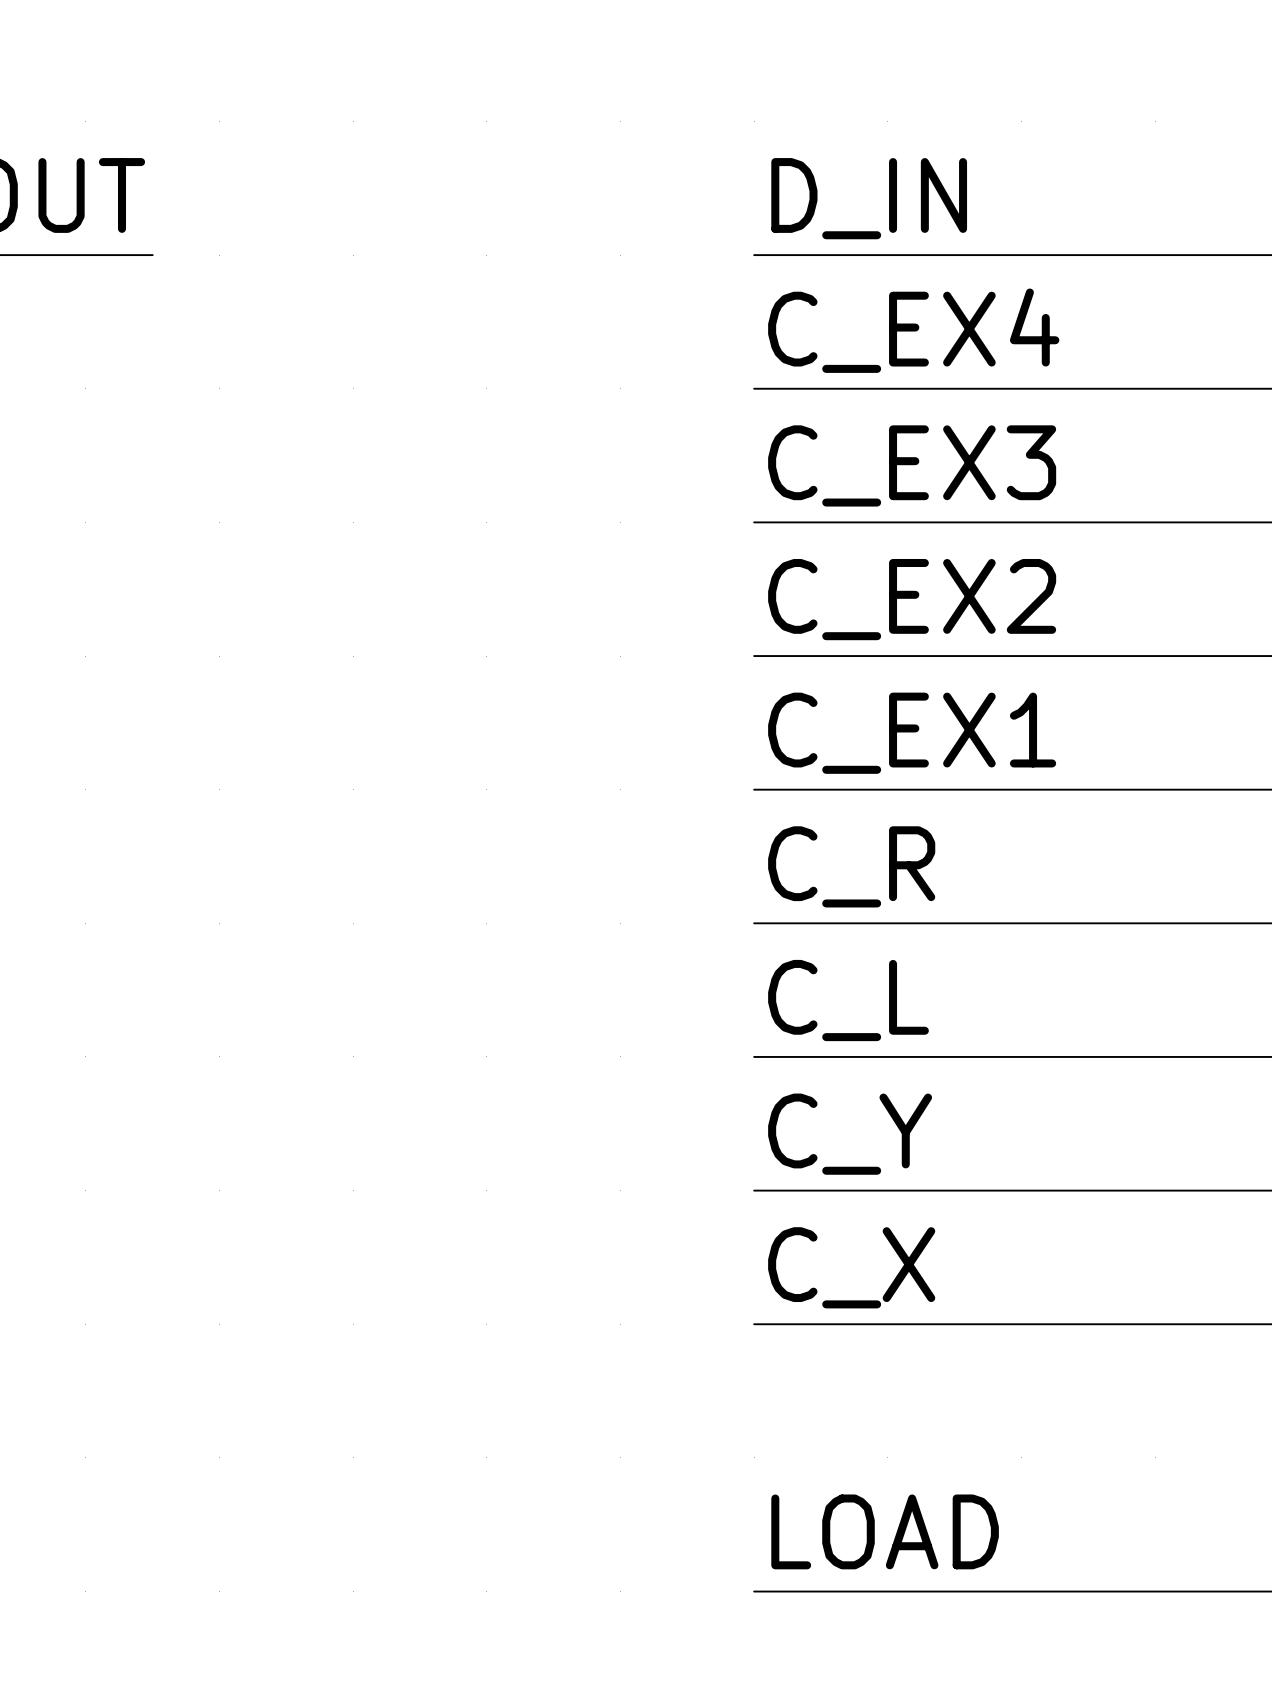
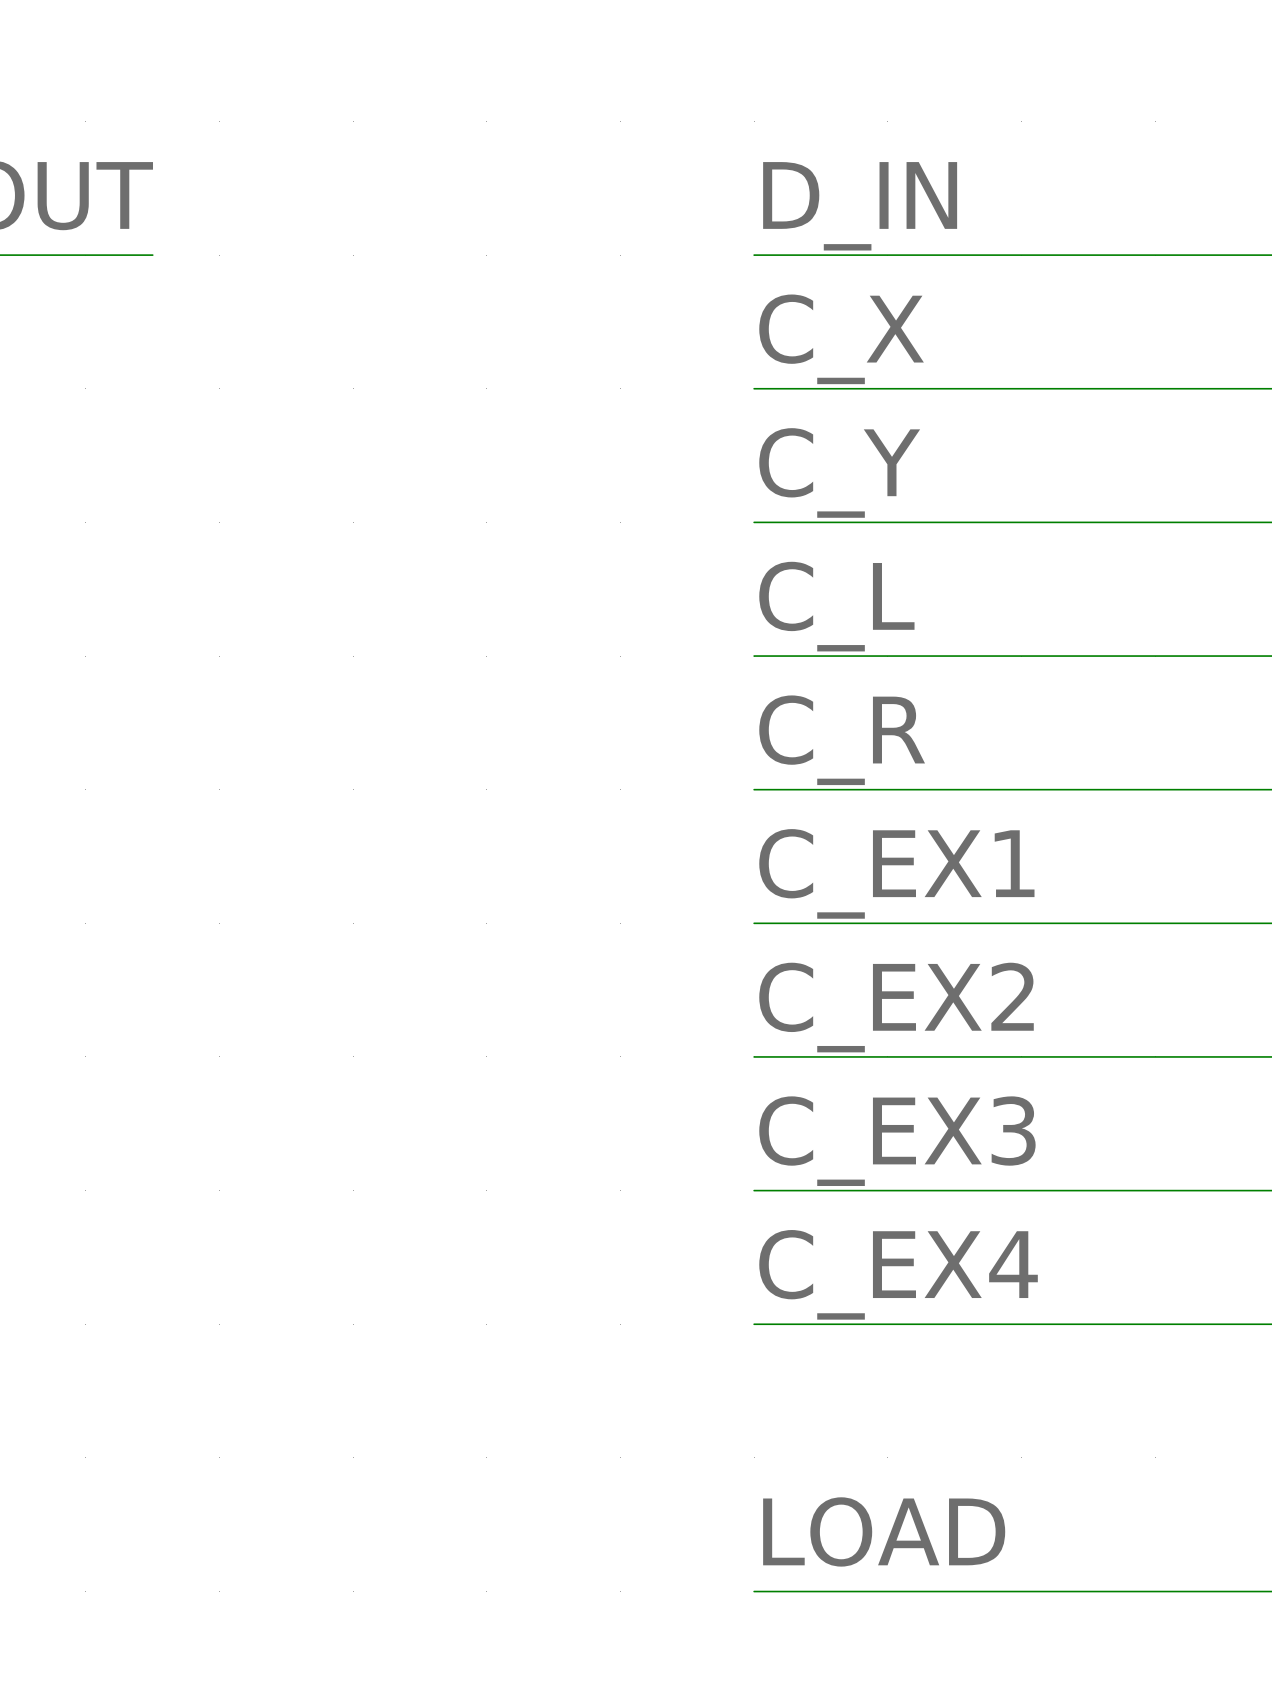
label: C_EX4 (913, 330) -> C_X (841, 339)
label: C_EX3 (912, 465) -> C_Y (839, 472)
label: C_EX2 (912, 599) -> C_L (836, 606)
label: C_EX1 (912, 733) -> C_R (842, 740)
label: C_R (851, 866) -> C_EX1 (896, 873)
label: C_L (848, 1000) -> C_EX2 (896, 1007)
label: C_Y (850, 1134) -> C_EX3 (897, 1141)
label: C_X (851, 1267) -> C_EX4 (898, 1274)

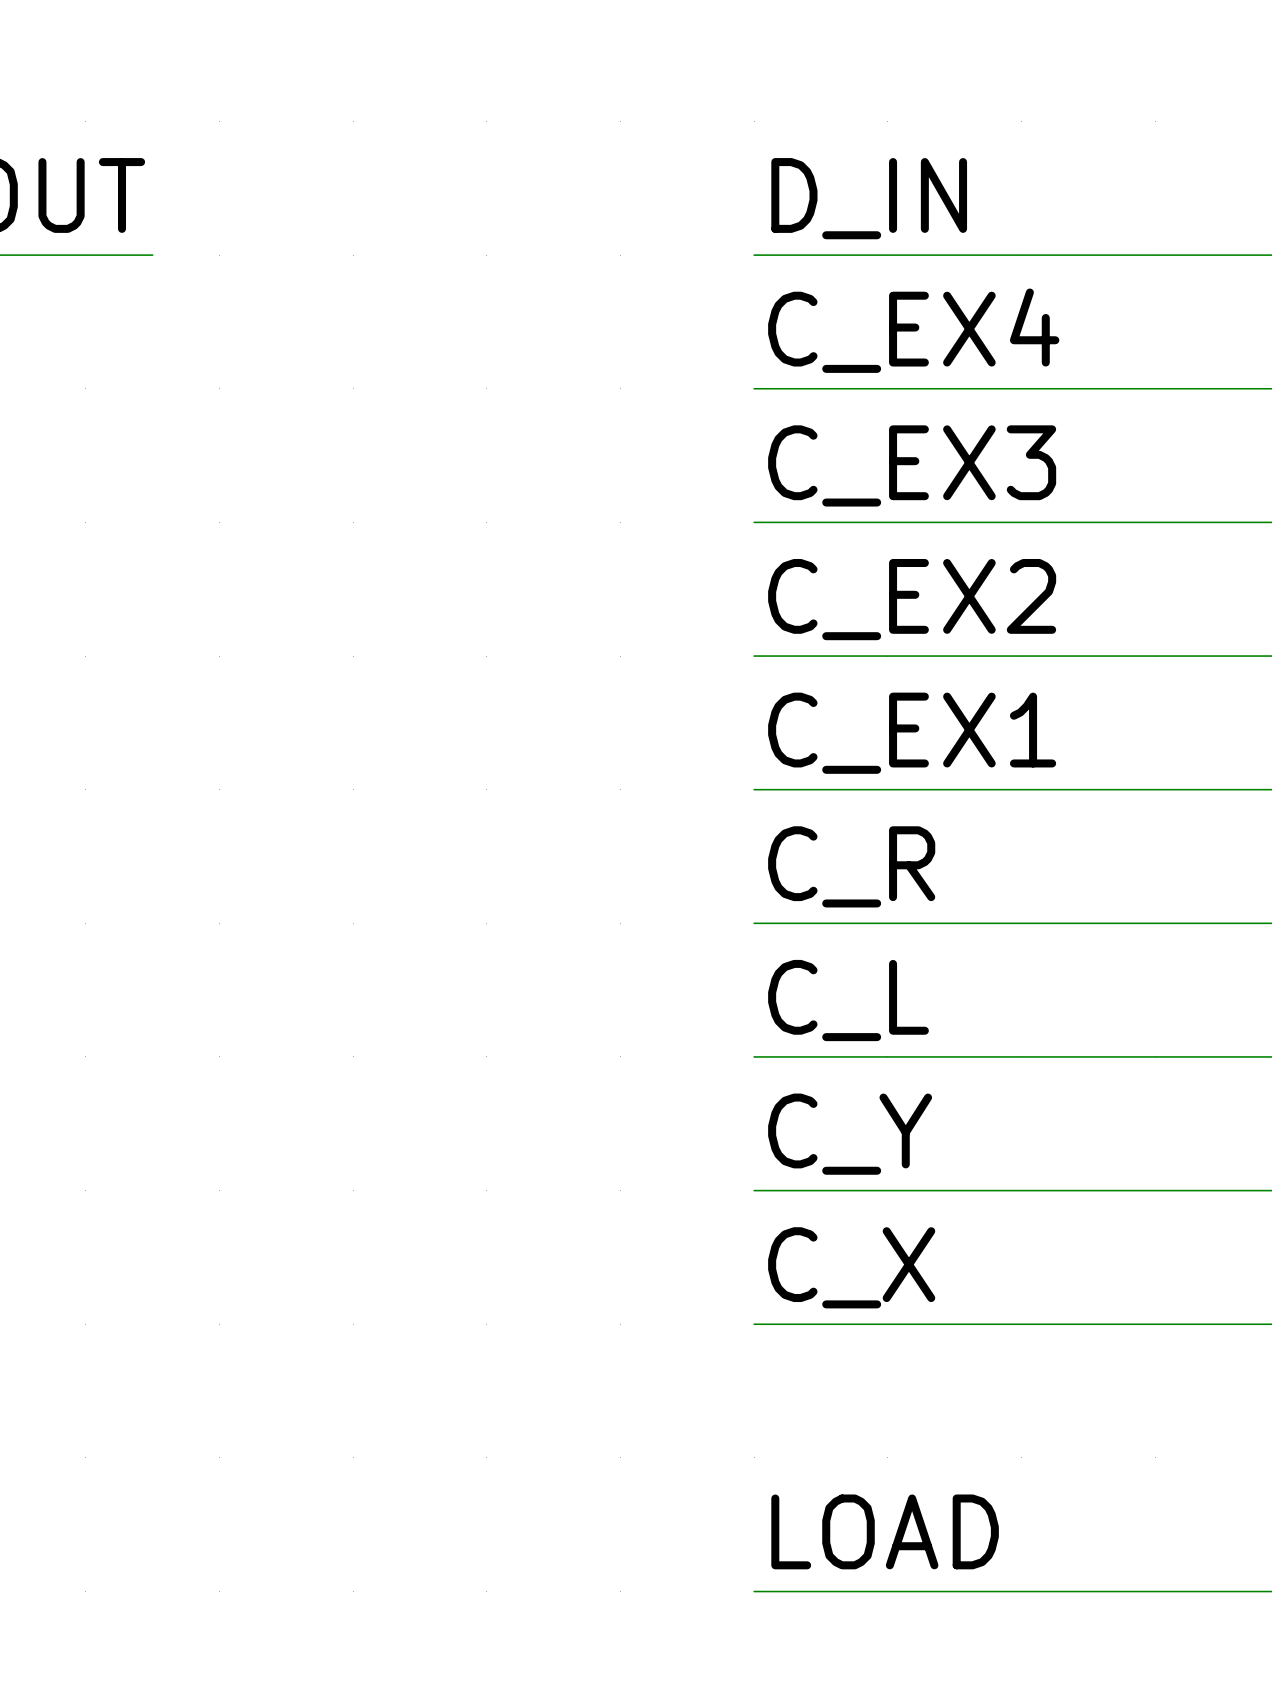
label: C_X (841, 339) -> C_EX4 (913, 330)
label: C_Y (839, 472) -> C_EX3 (912, 465)
label: C_L (836, 606) -> C_EX2 (912, 599)
label: C_R (842, 740) -> C_EX1 (912, 733)
label: C_EX1 (896, 873) -> C_R (851, 866)
label: C_EX2 (896, 1007) -> C_L (848, 1000)
label: C_EX3 (897, 1141) -> C_Y (850, 1134)
label: C_EX4 (898, 1274) -> C_X (851, 1267)

